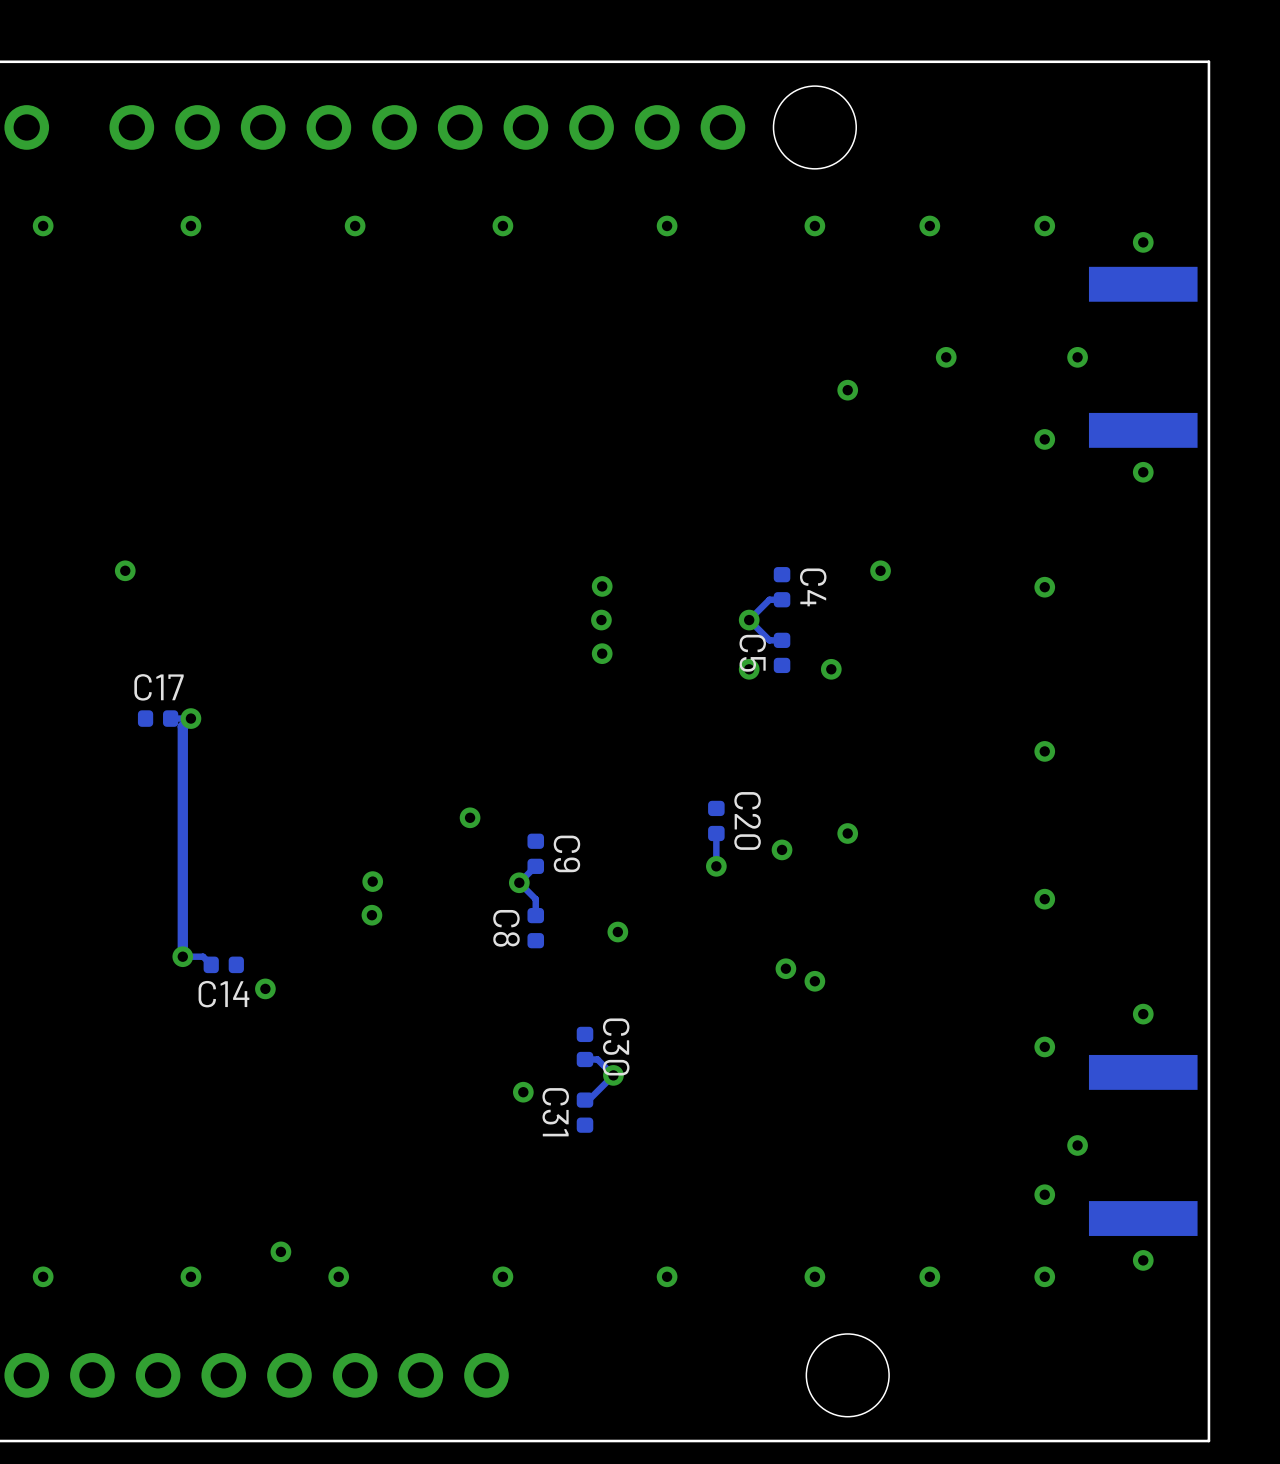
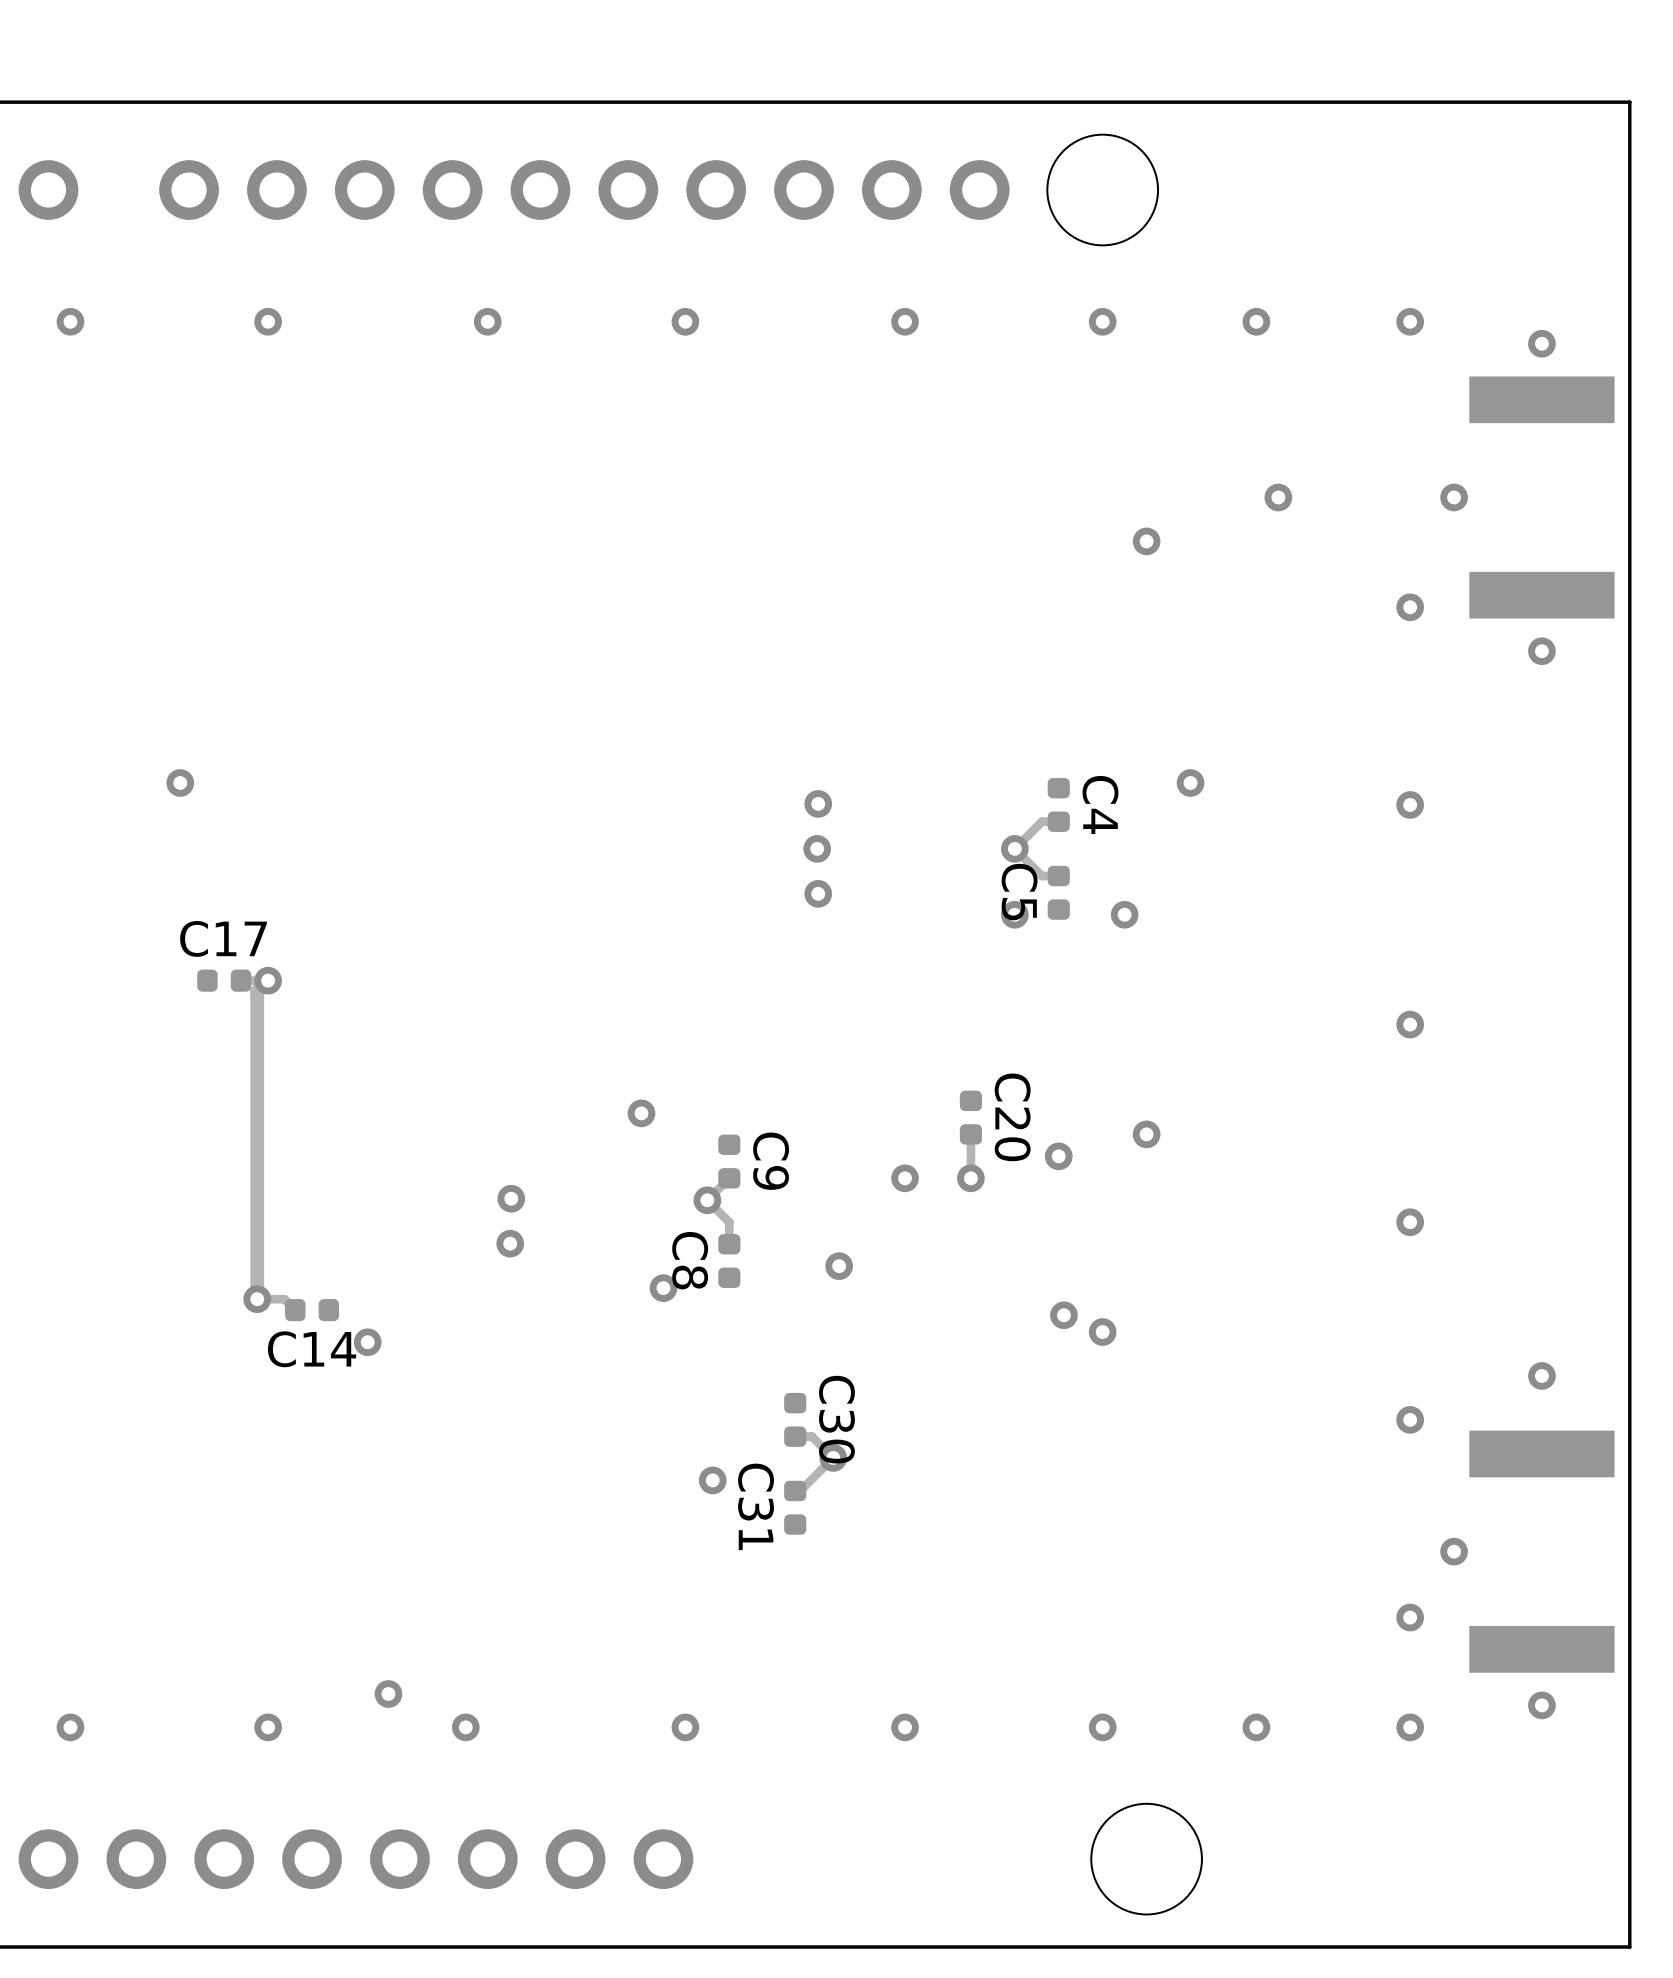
via: none -> (905, 1178)
via: none -> (663, 1288)

